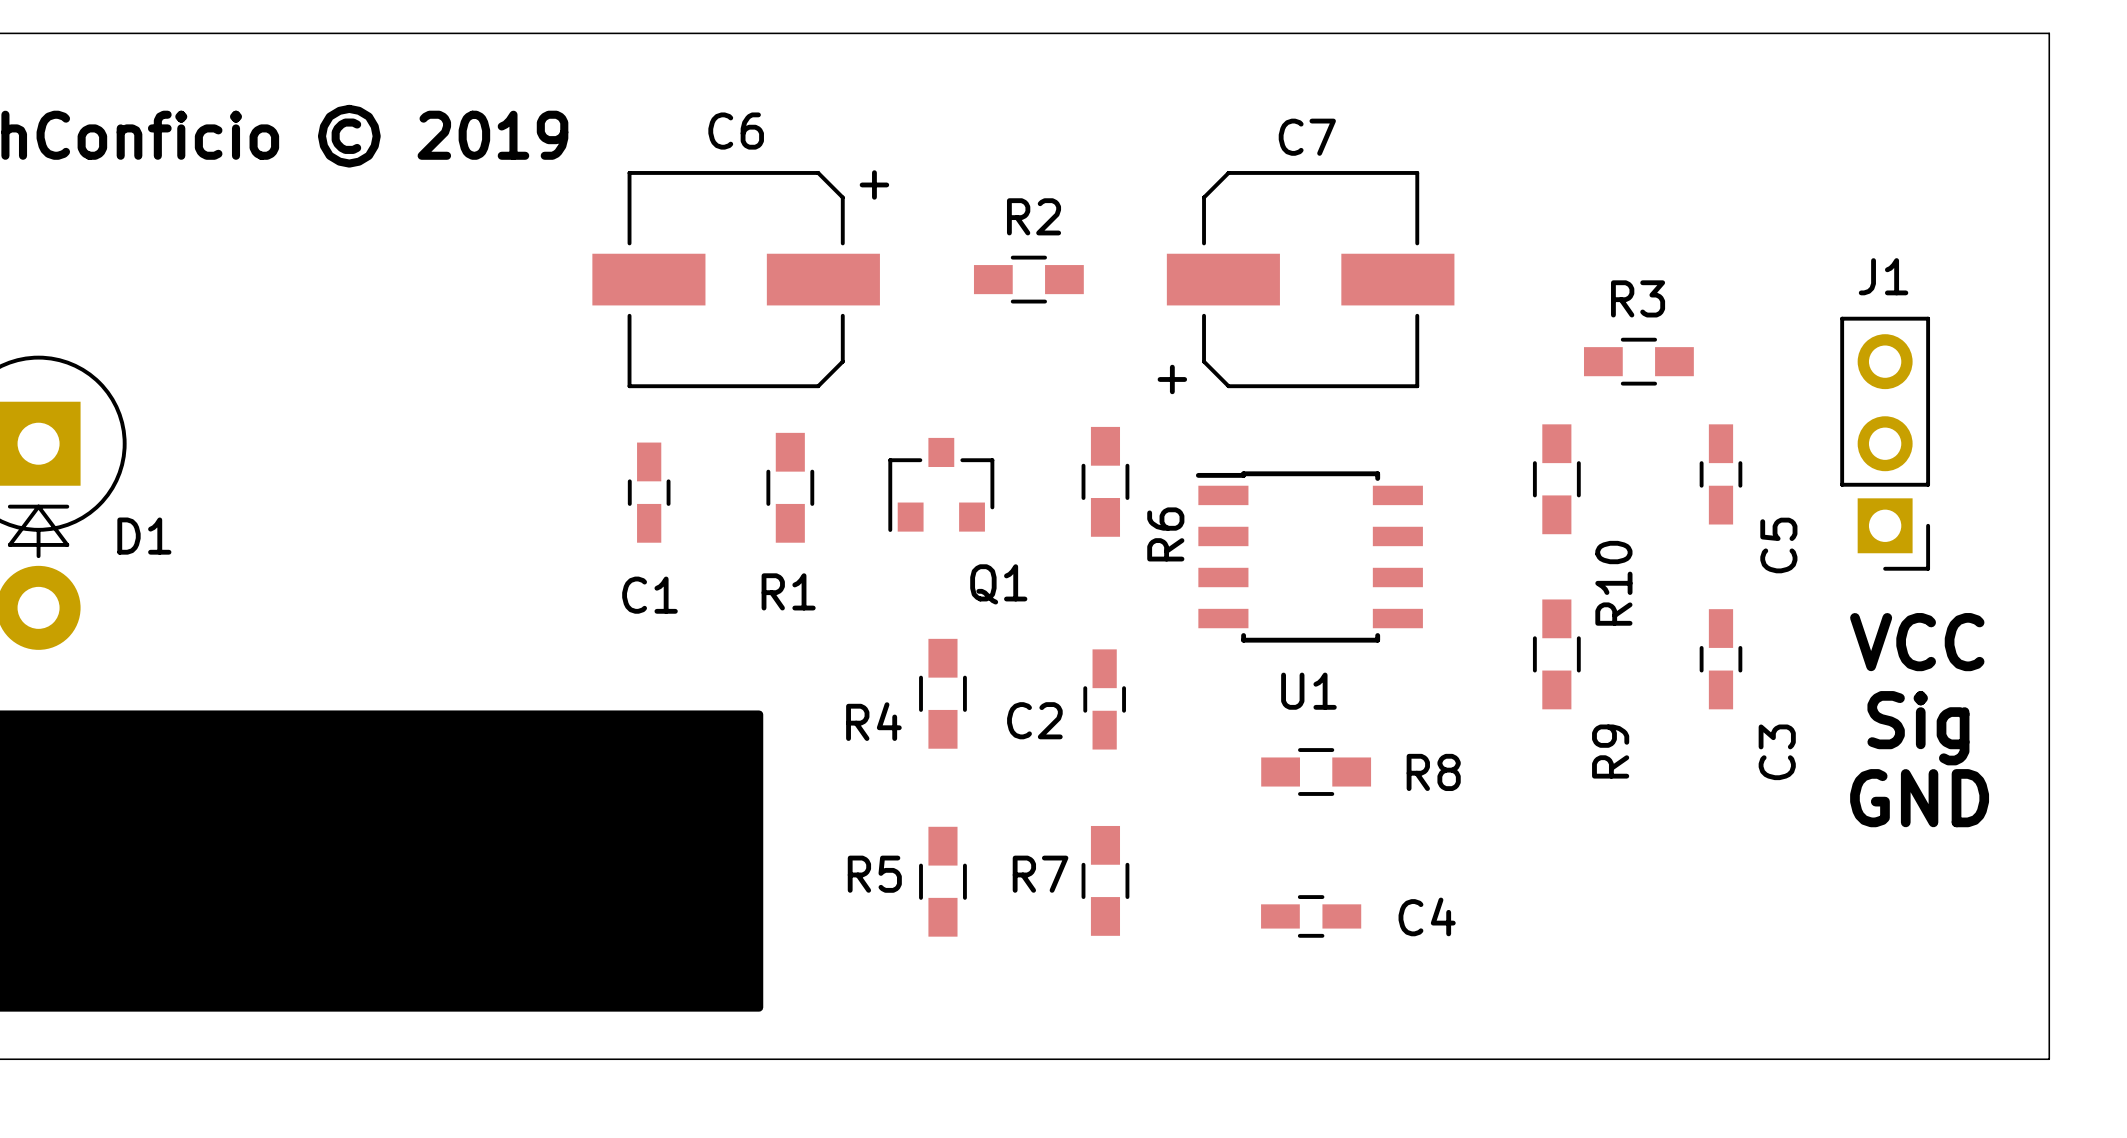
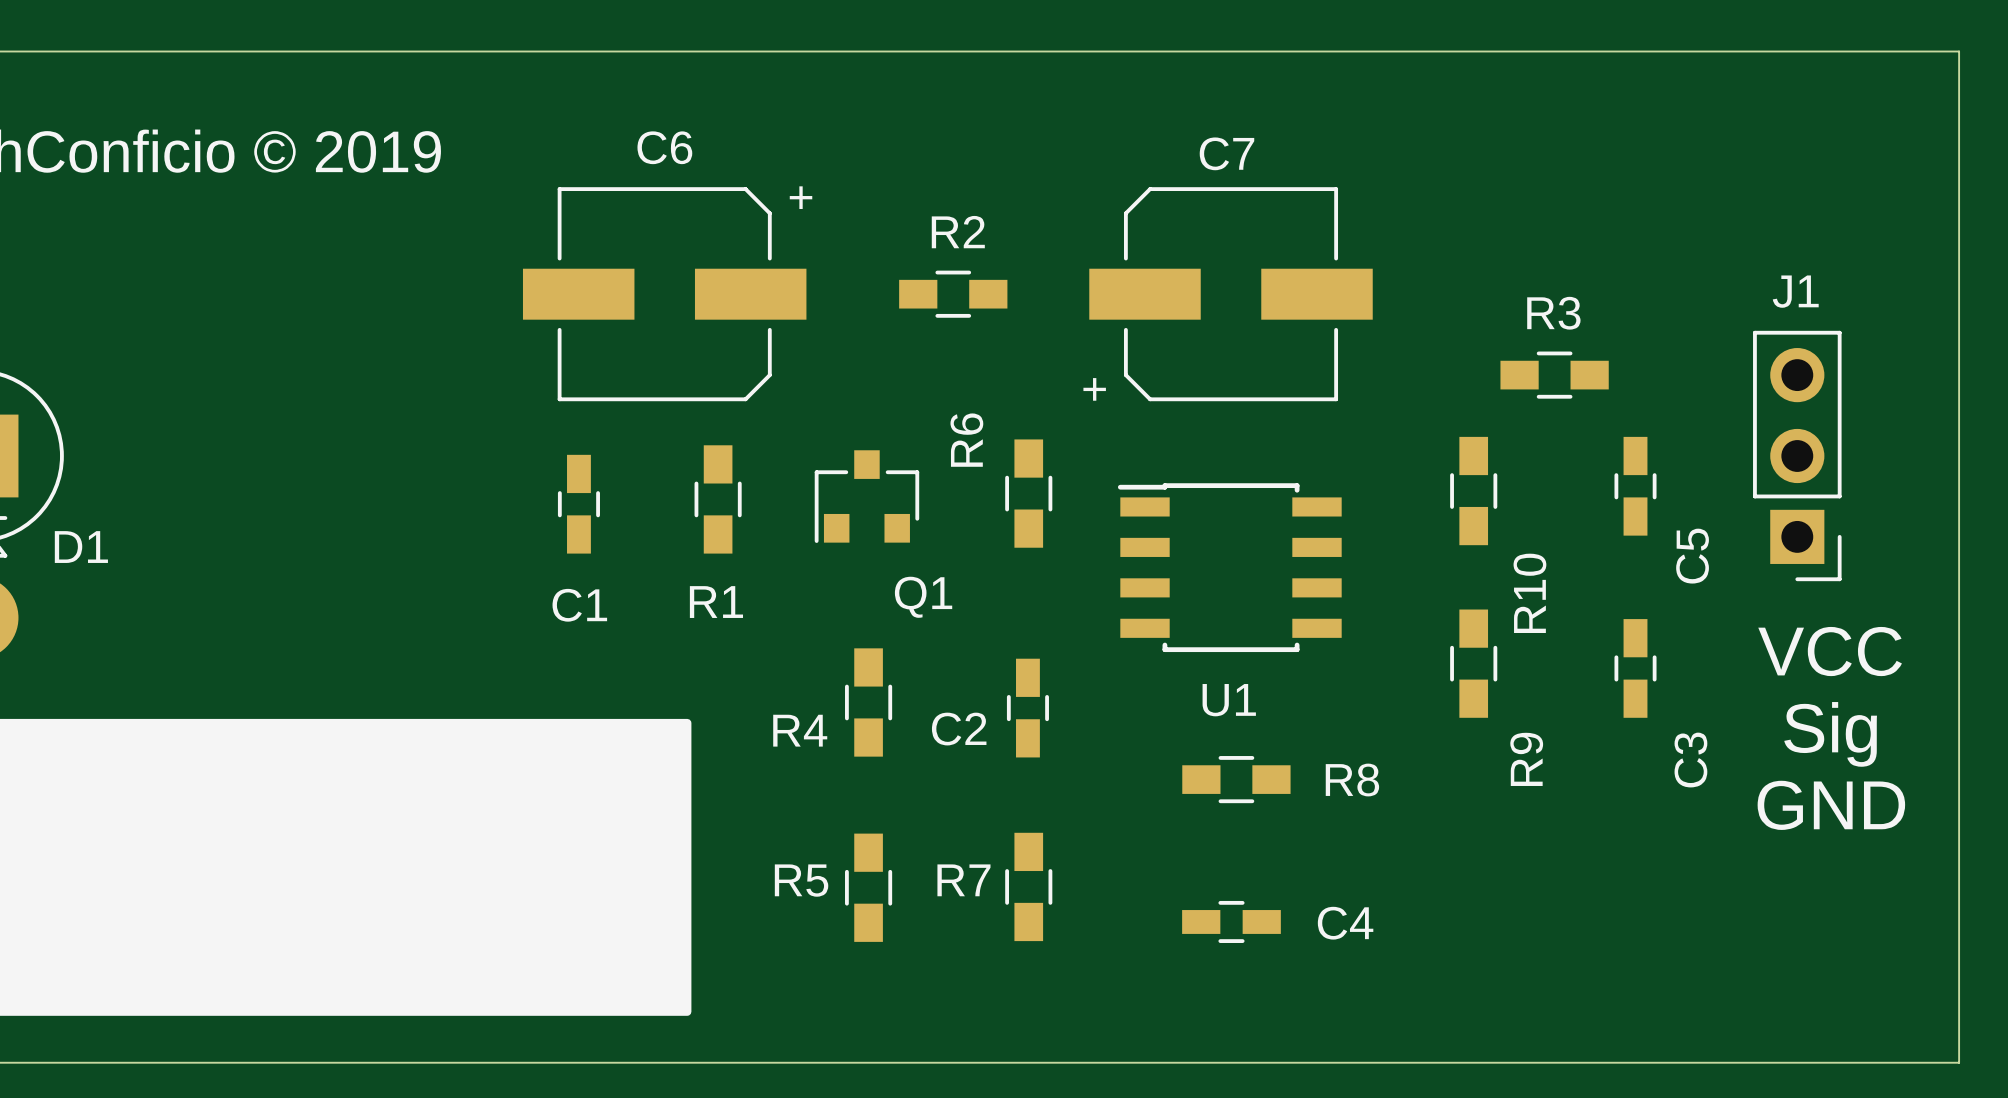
R6 name position: R6 (1165, 534) -> R6 (966, 440)

